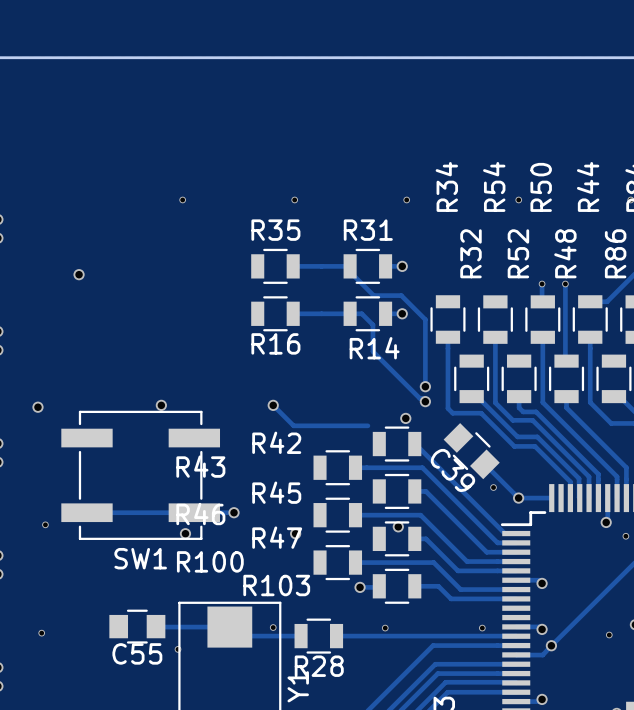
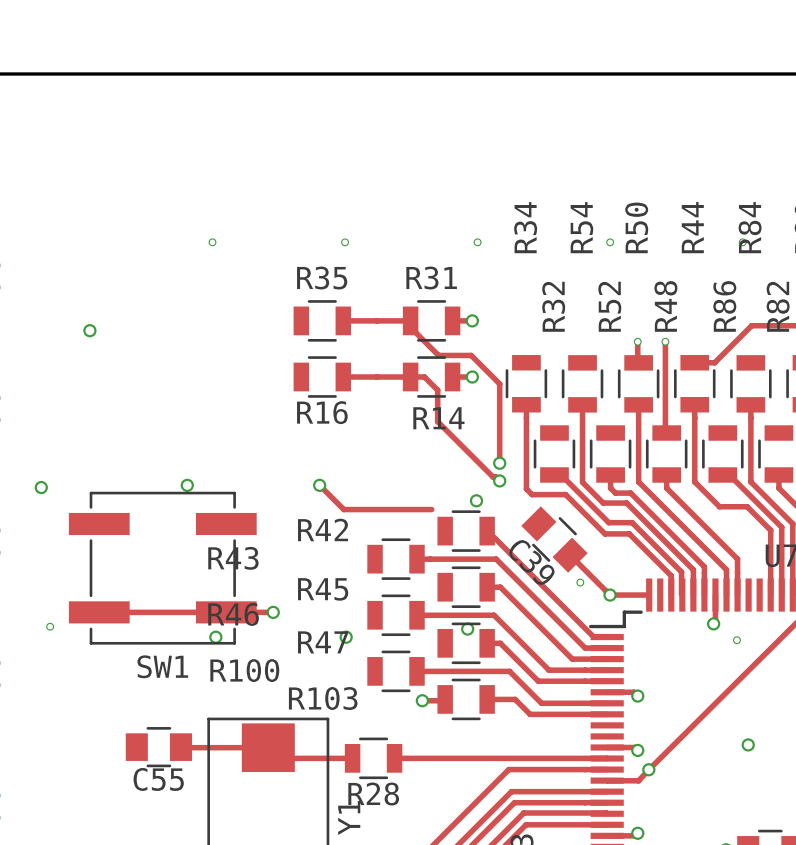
via: (273, 627) -> none
via: (385, 628) -> none
via: (482, 628) -> none
via: (41, 633) -> none
via: (609, 635) -> none
via: (178, 649) -> none

